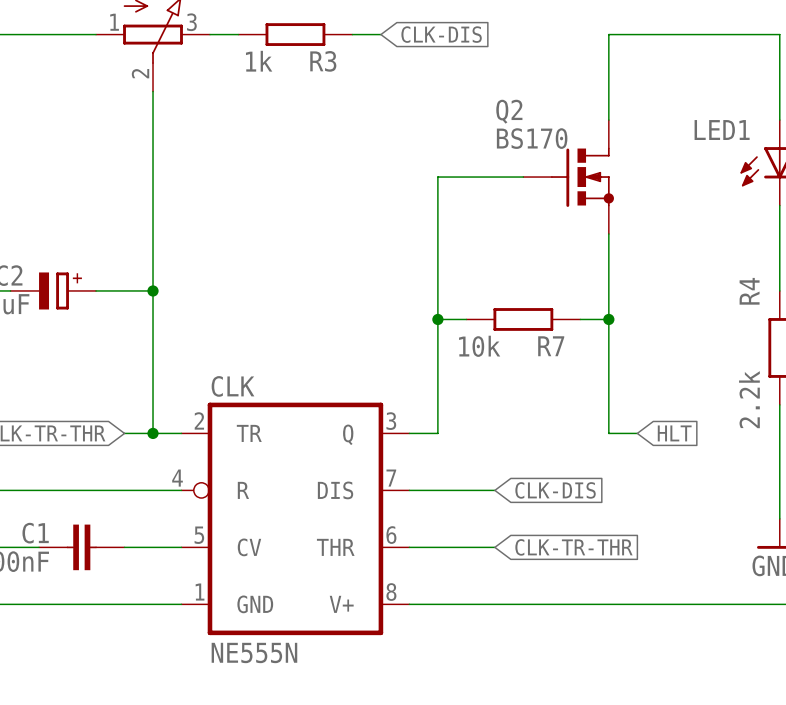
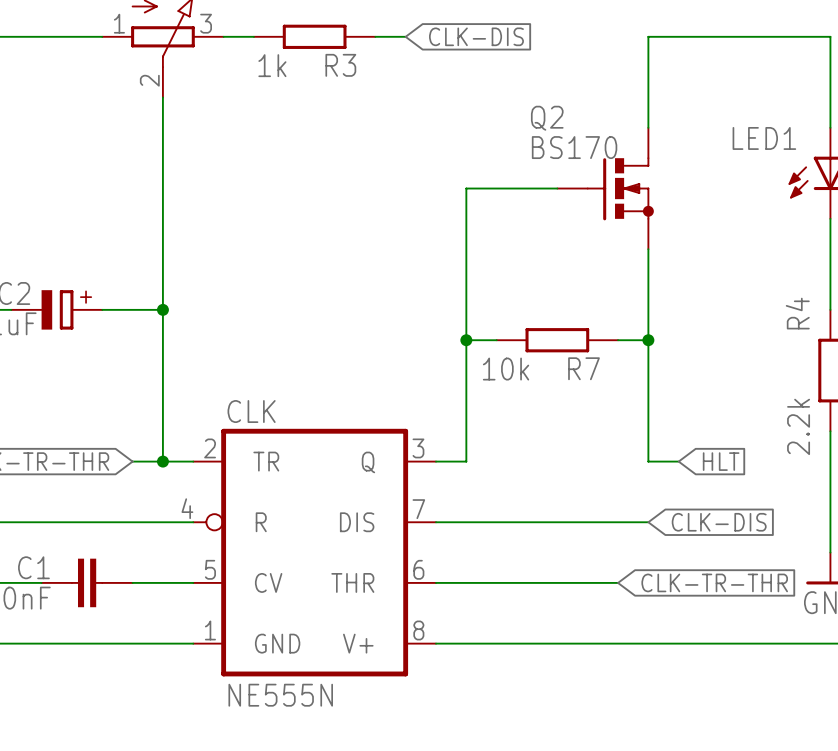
wire: none -> (527, 522) (648, 522)
global label position: CLK-DIS (555, 490) -> CLK-DIS (719, 522)
wire: none -> (527, 582) (618, 582)
global label position: CLK-TR-THR (573, 547) -> CLK-TR-THR (714, 582)

